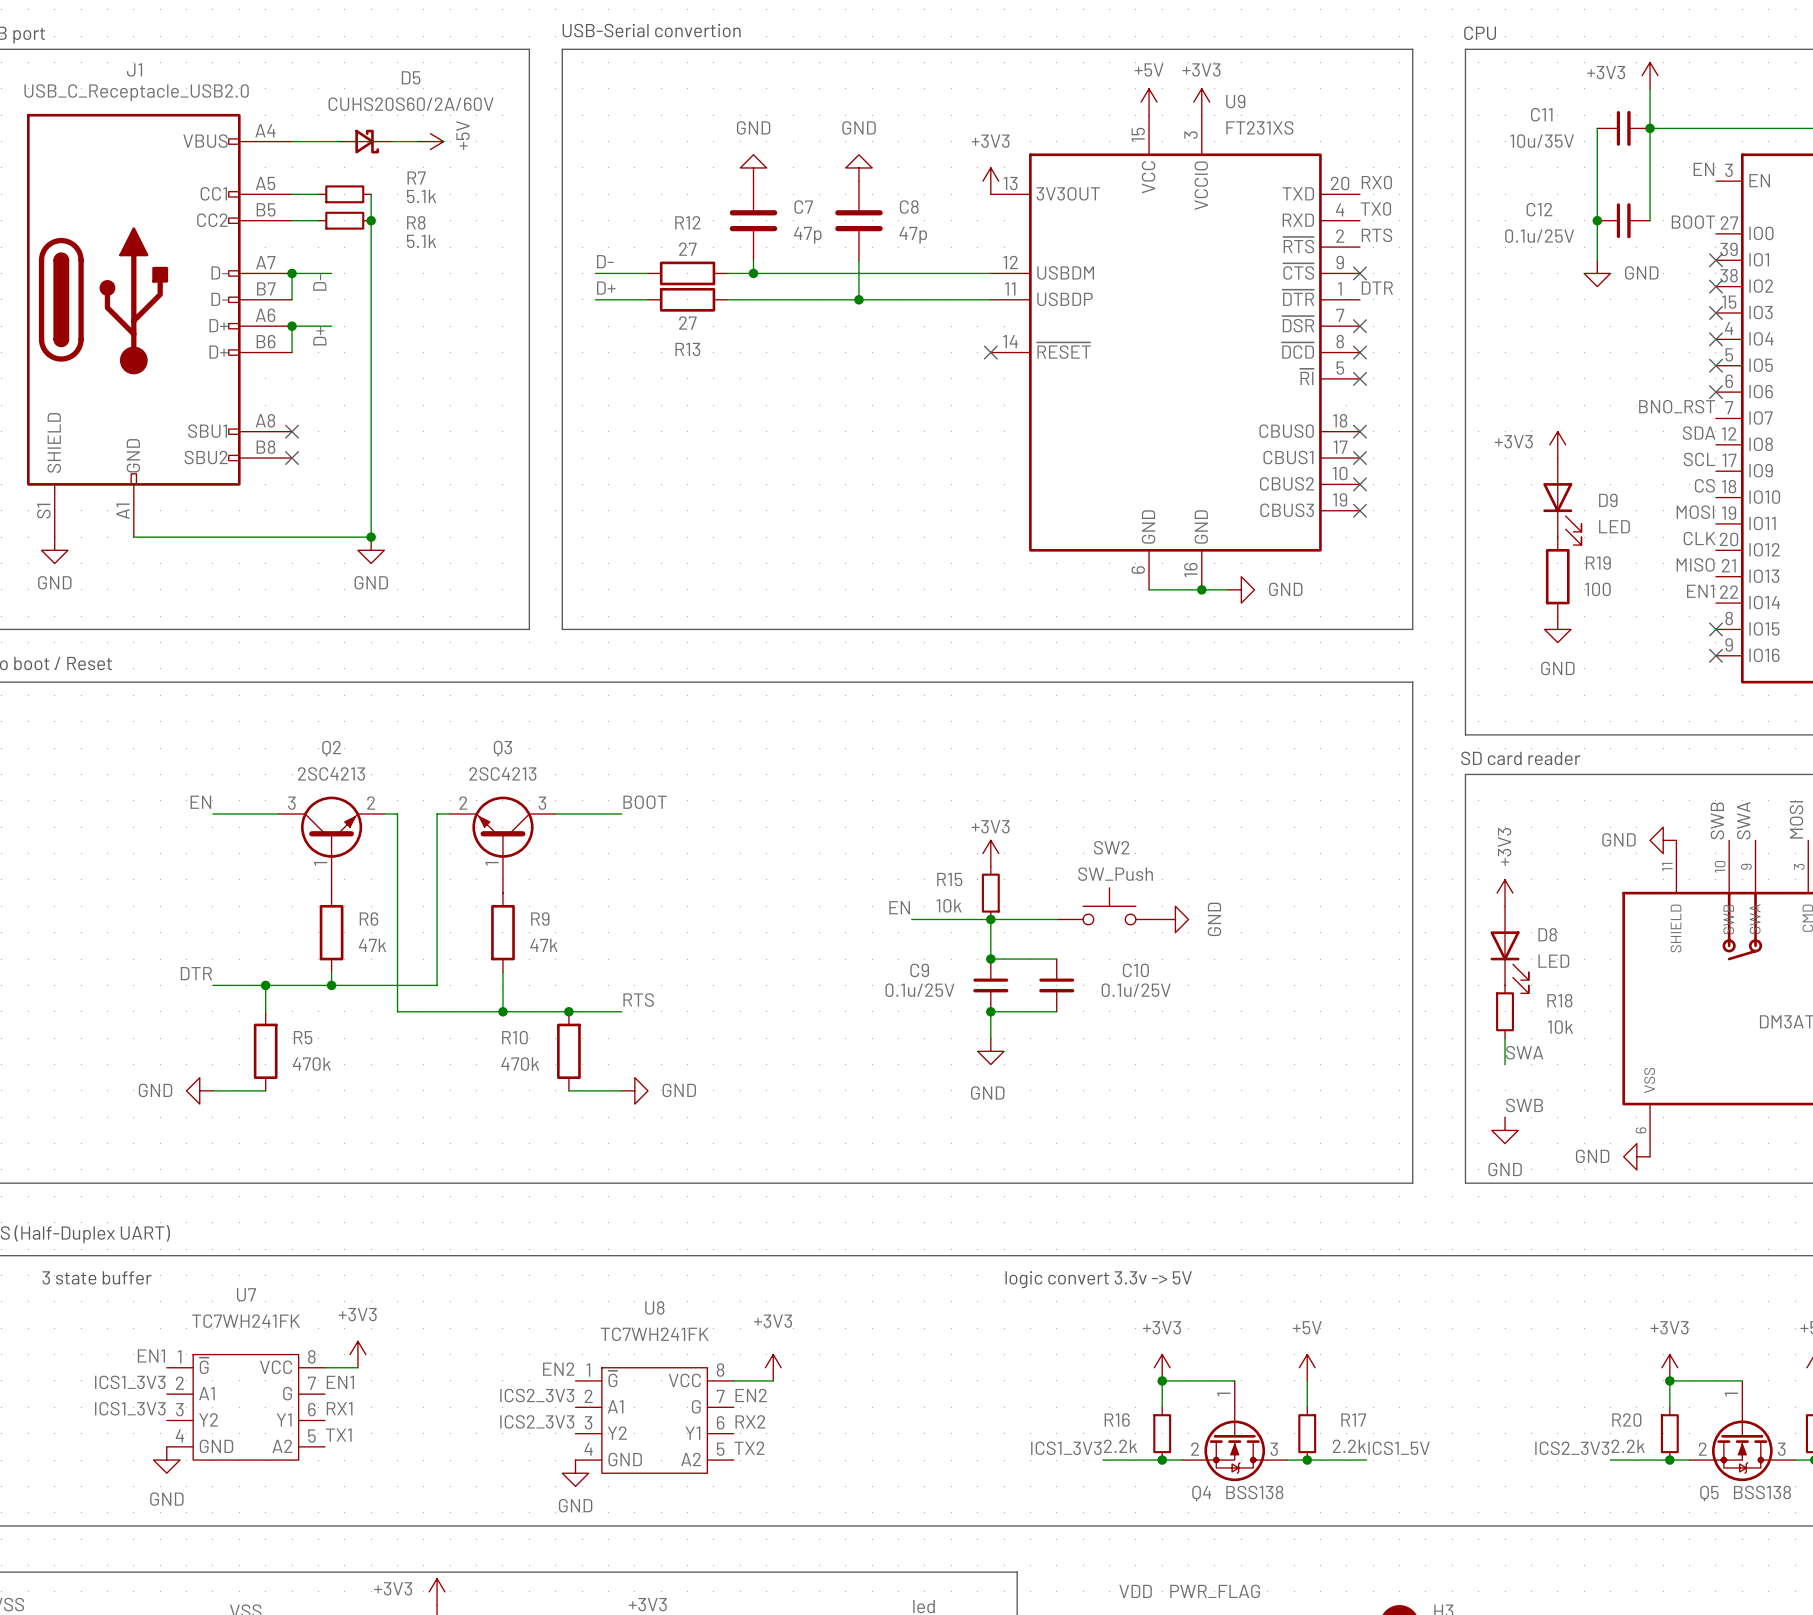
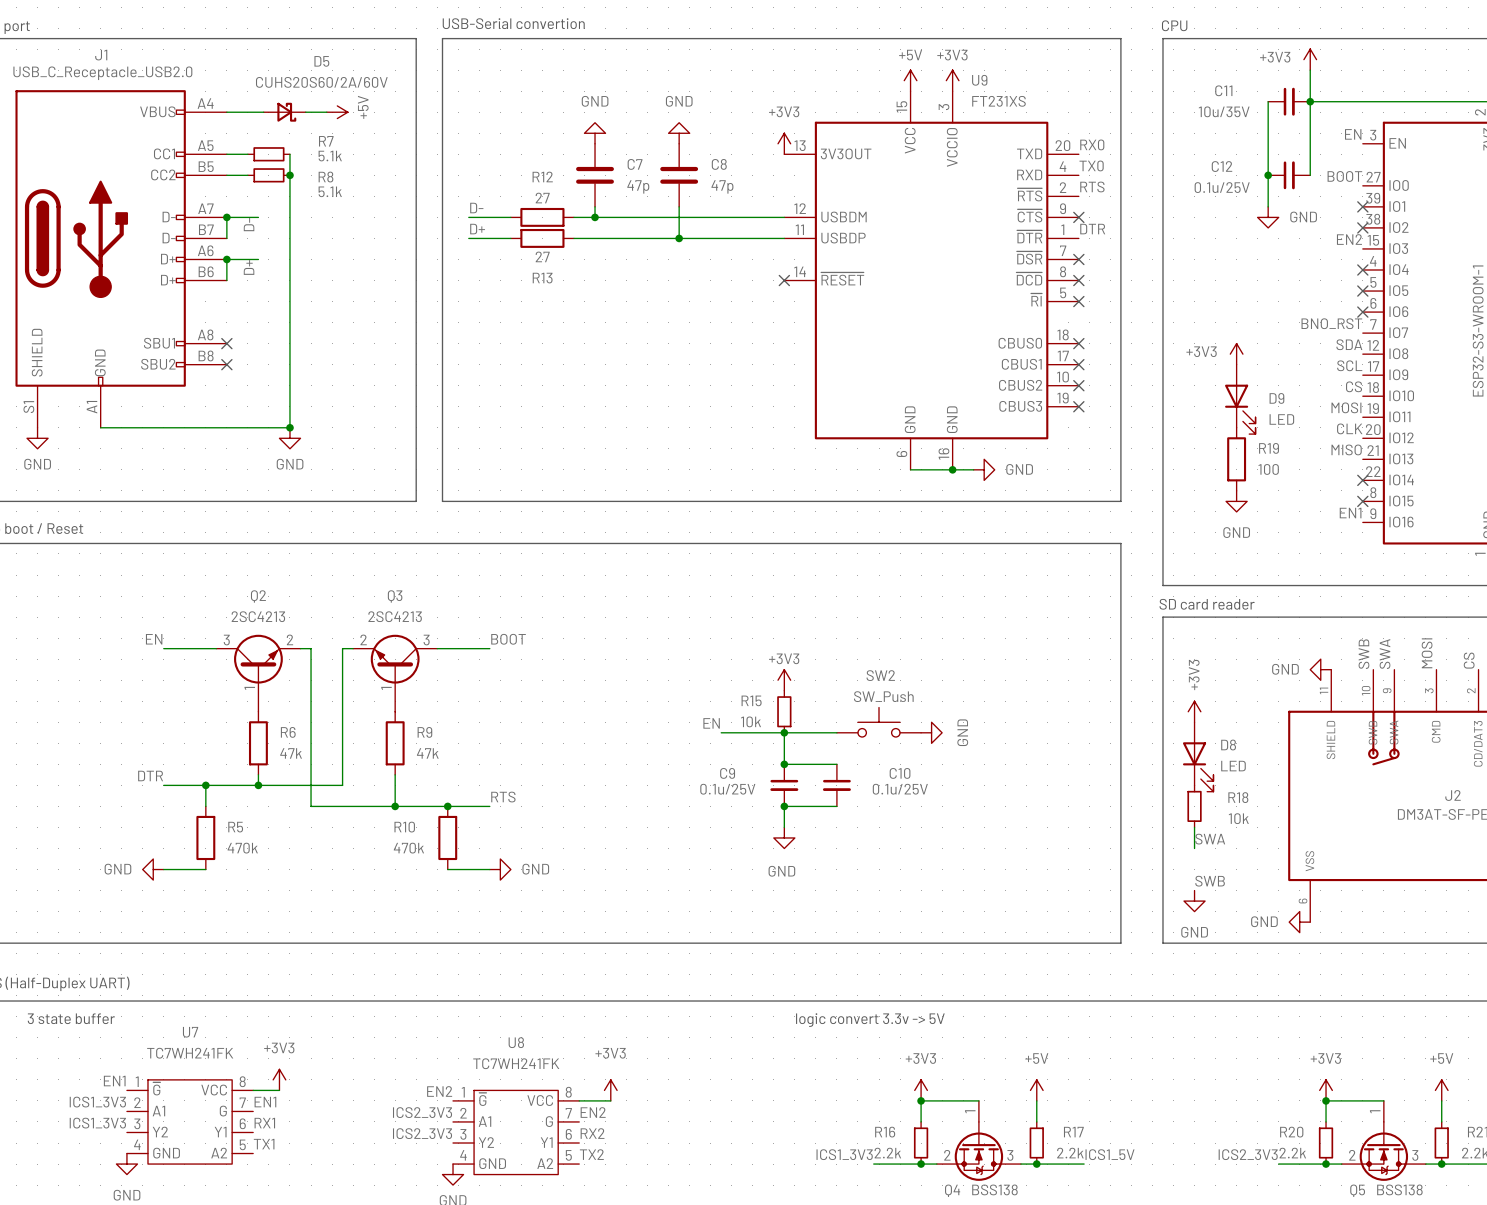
label: none -> EN2 (1349, 239)
no-connect mark: (1715, 312) -> none
label position: EN1 (1700, 591) -> EN1 (1350, 513)
no-connect mark position: (1715, 655) -> (1362, 480)

